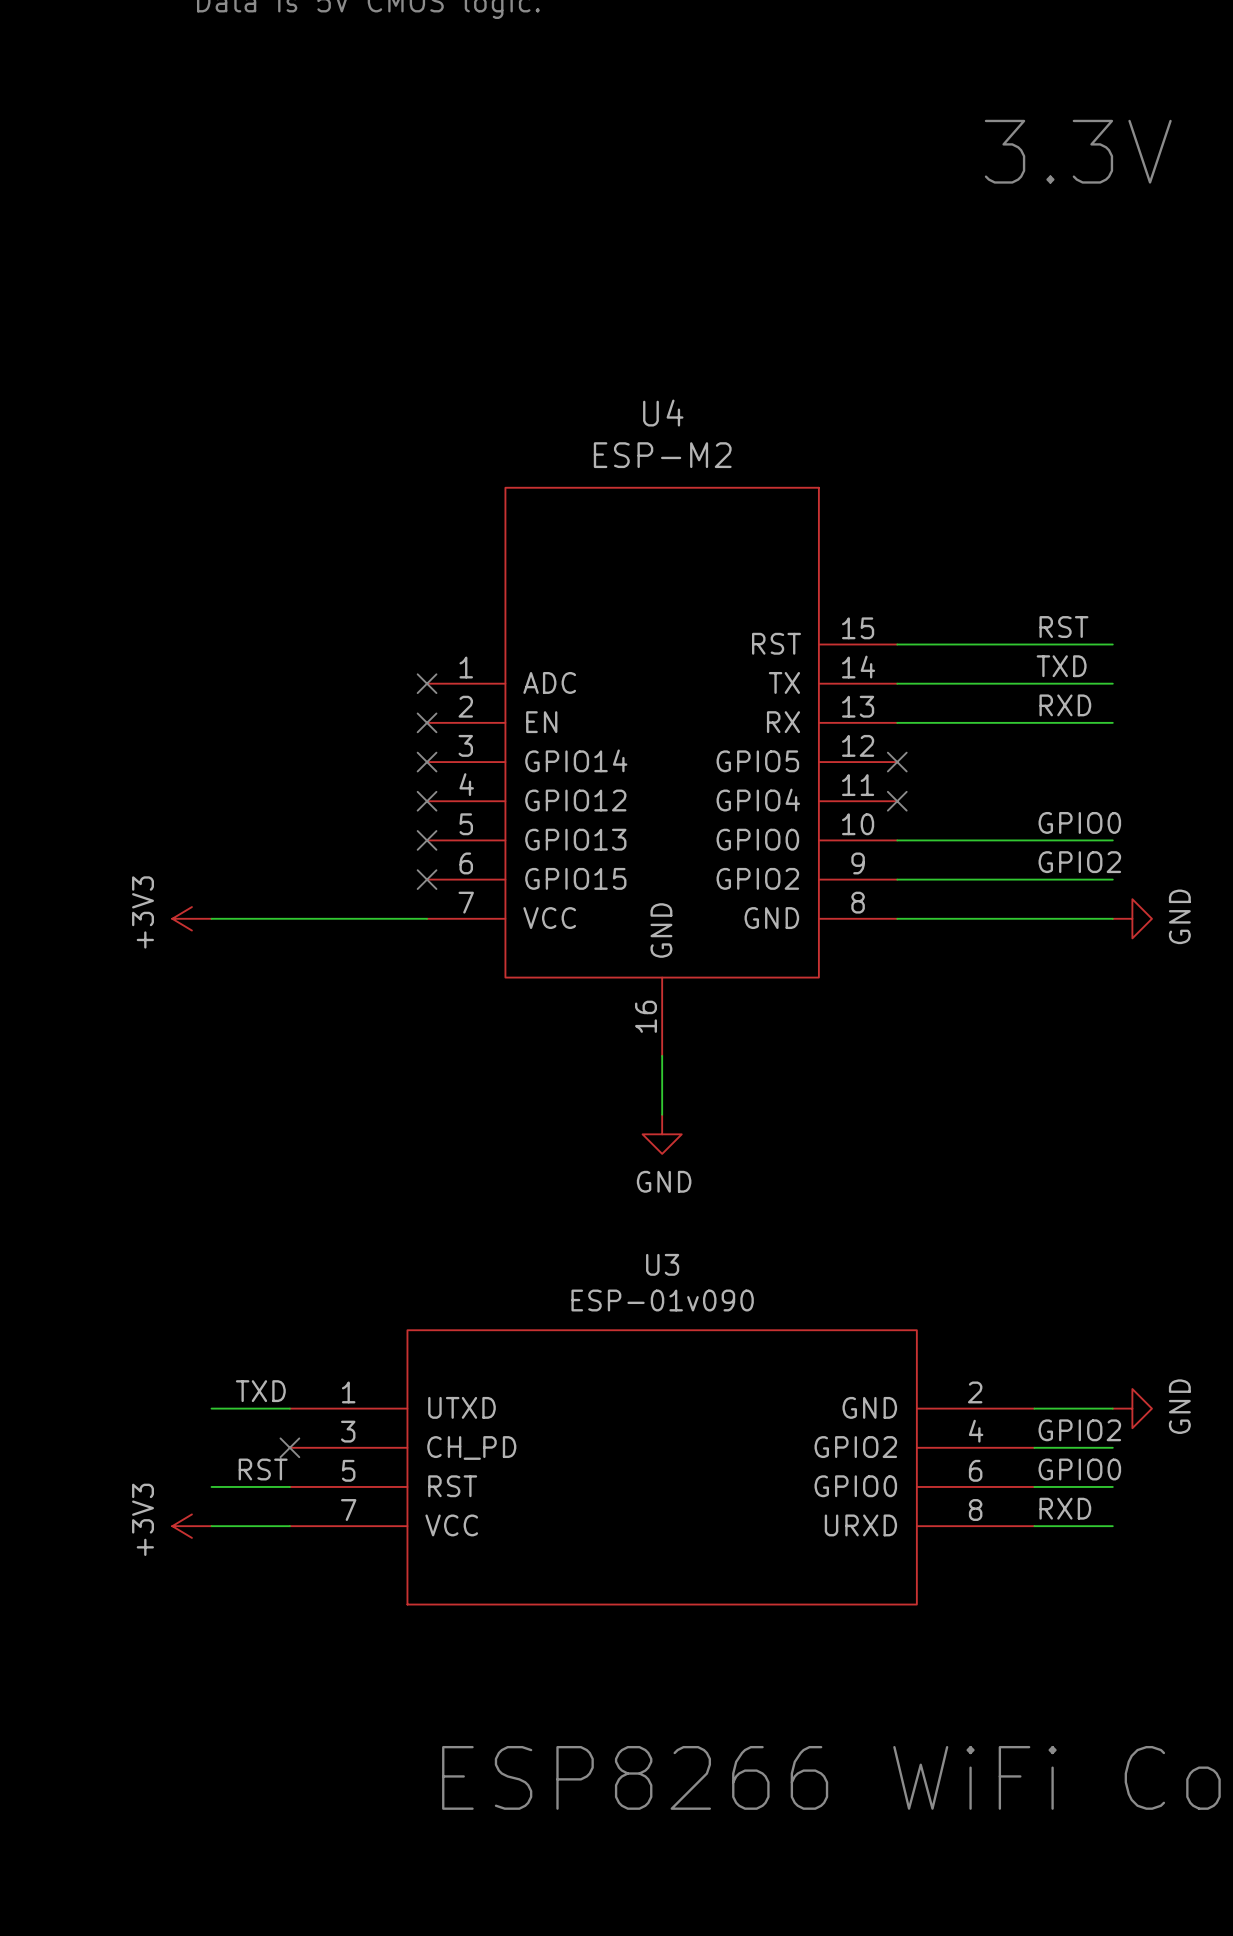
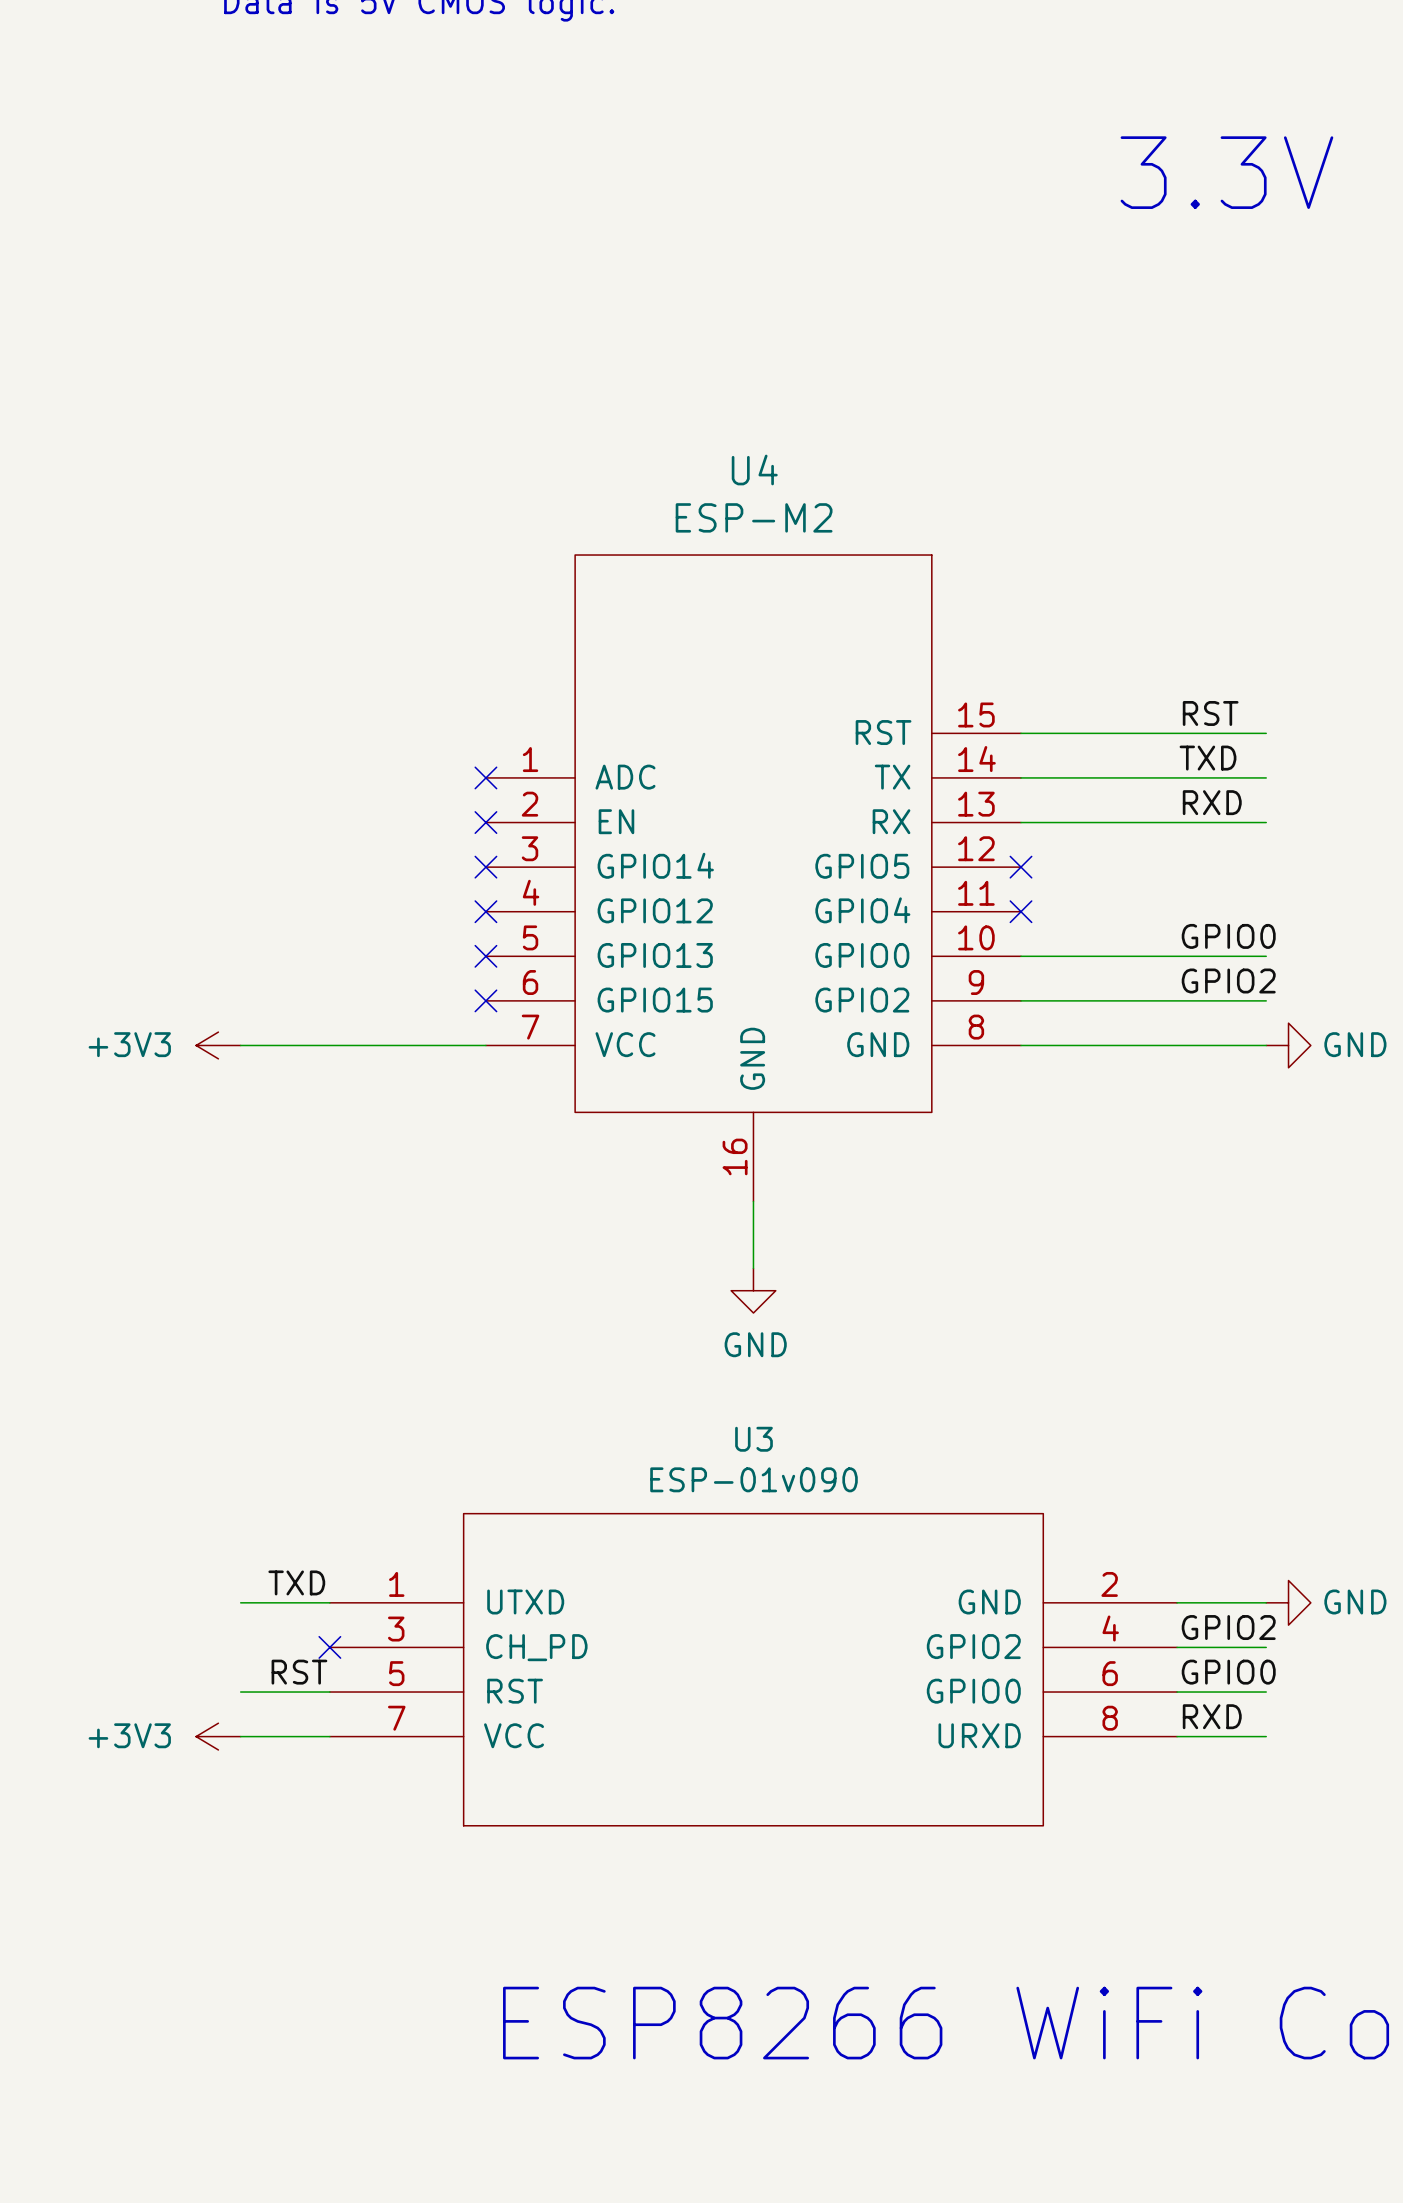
power symbol text rotation: 0° (143, 912) -> 90° clockwise (129, 1044)
power symbol text rotation: 0° (1179, 916) -> 90° clockwise (1355, 1044)
power symbol text rotation: 0° (1179, 1406) -> 90° clockwise (1355, 1602)
power symbol text rotation: 0° (143, 1519) -> 90° clockwise (129, 1735)

